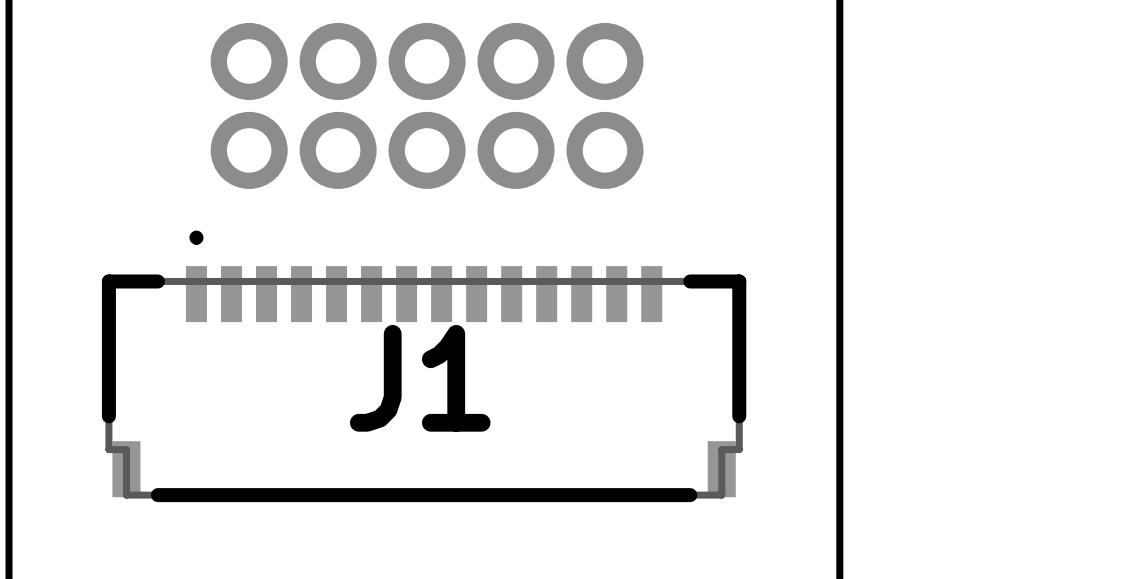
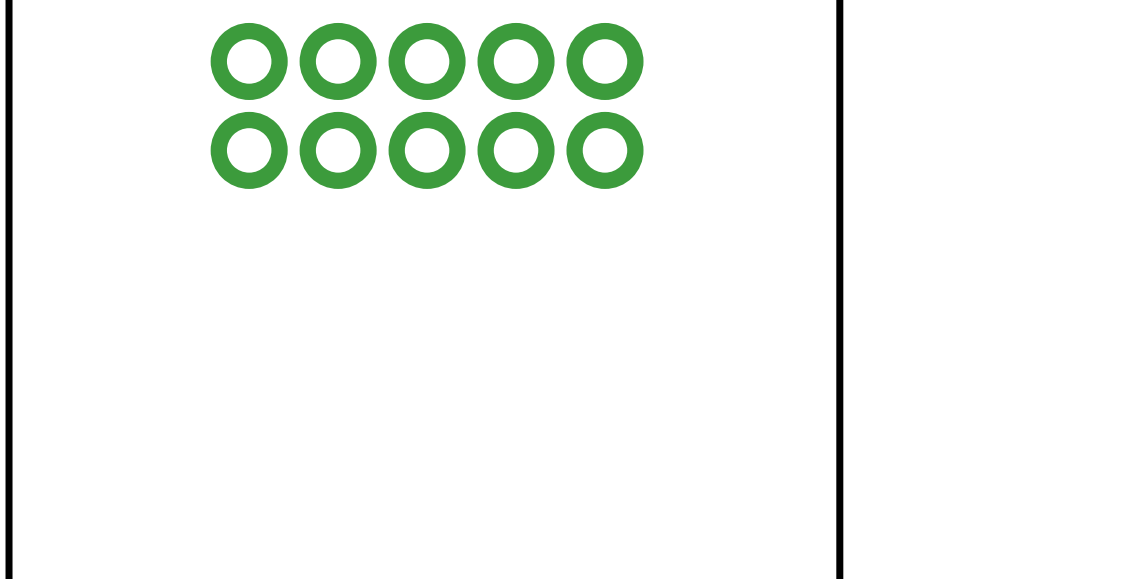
J1: (424, 366) -> none

